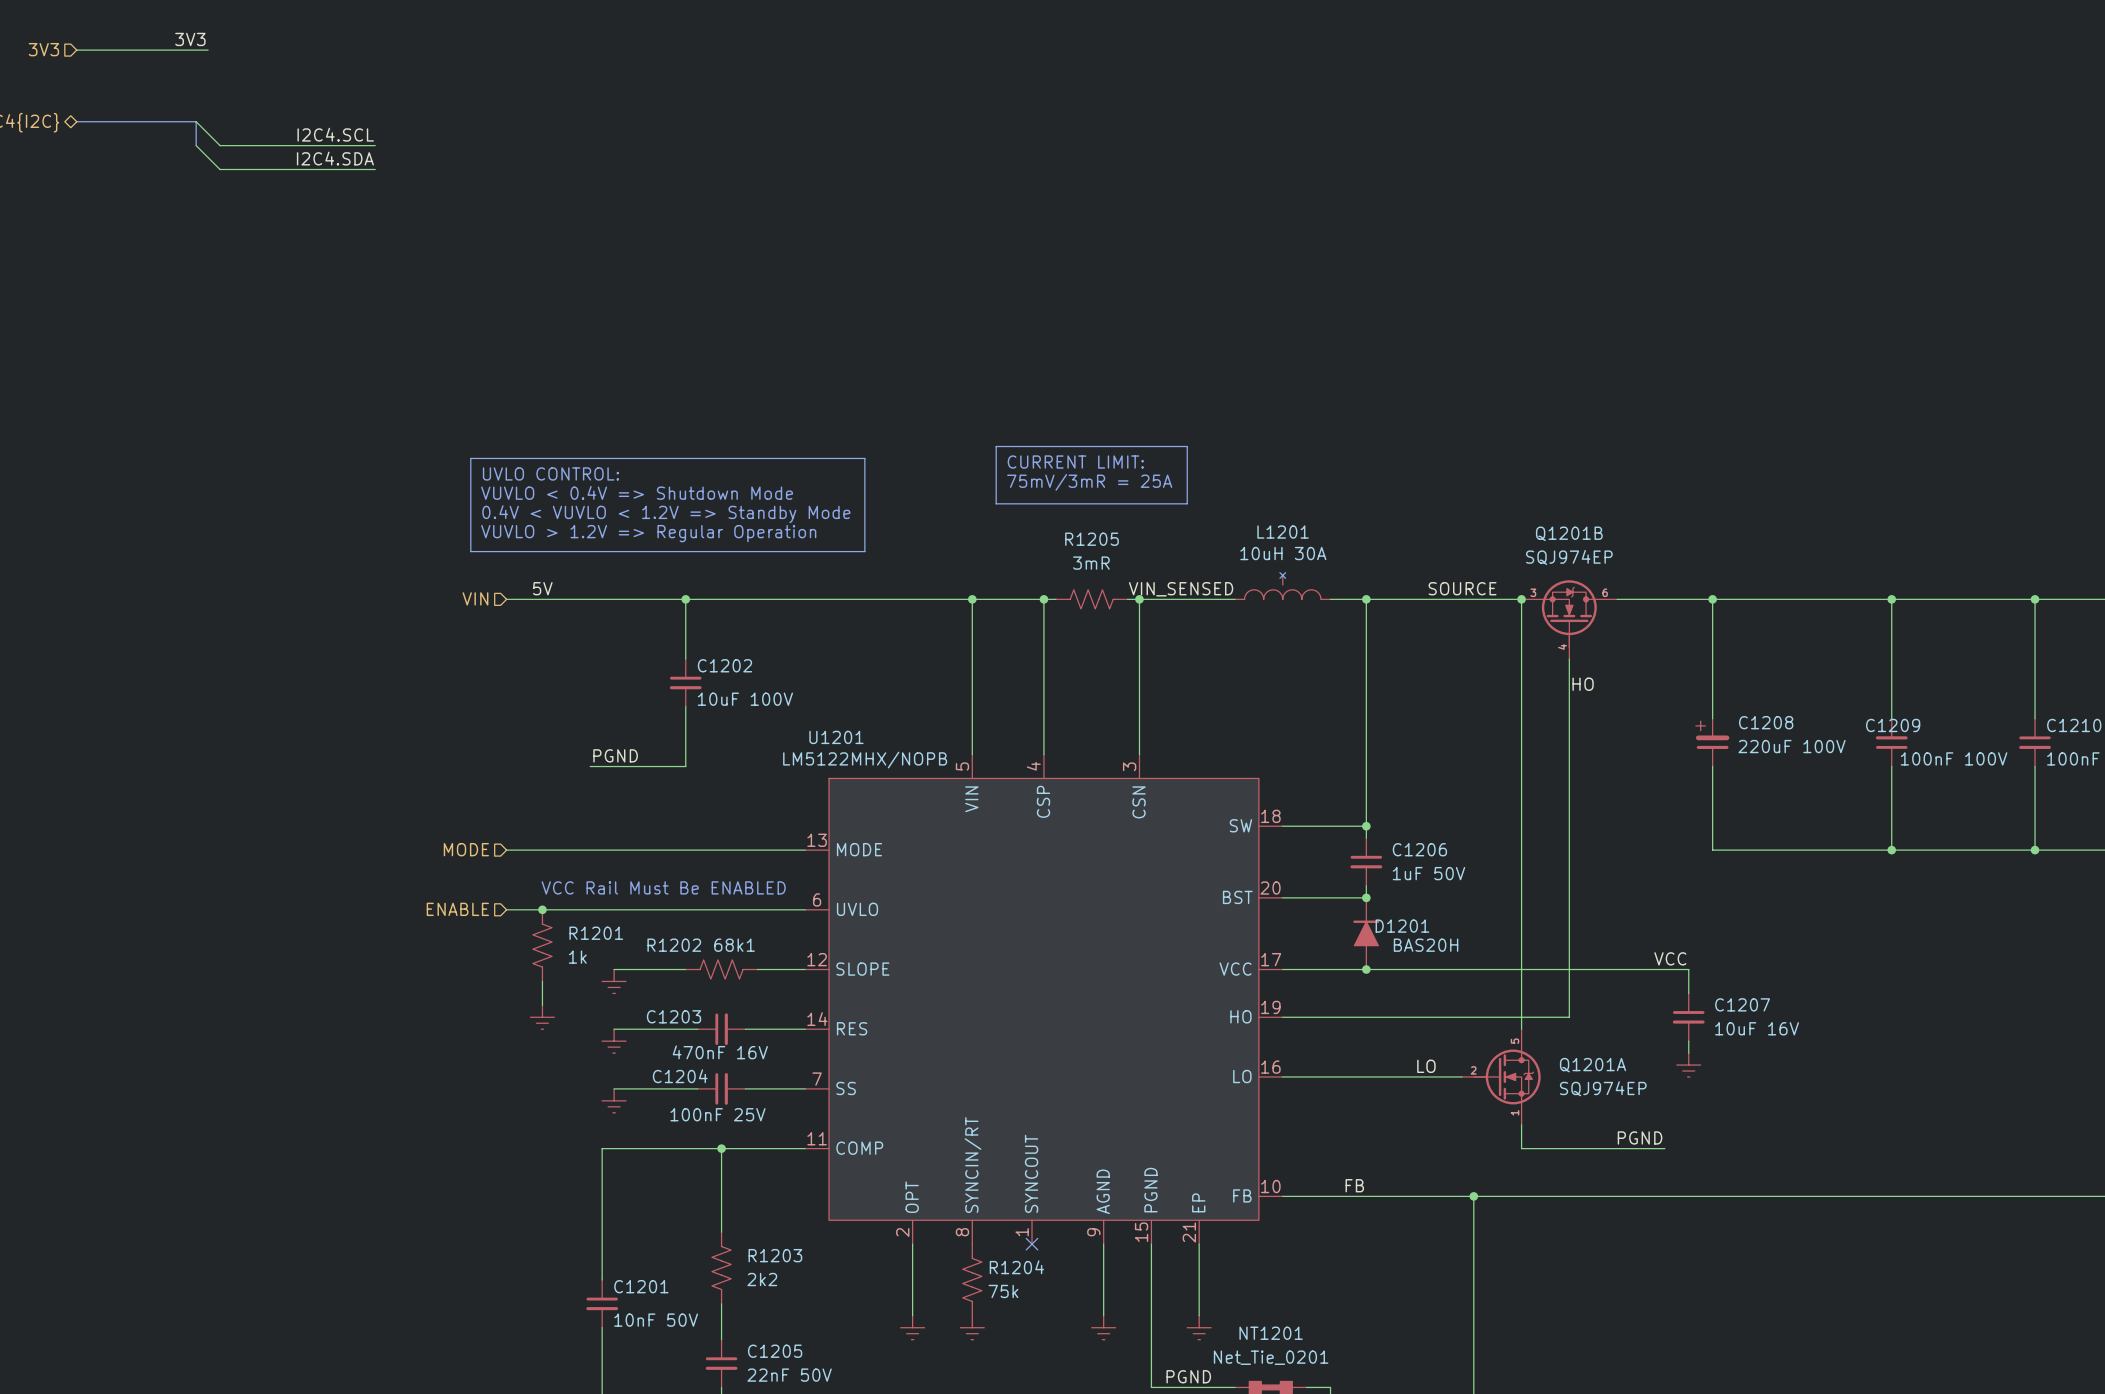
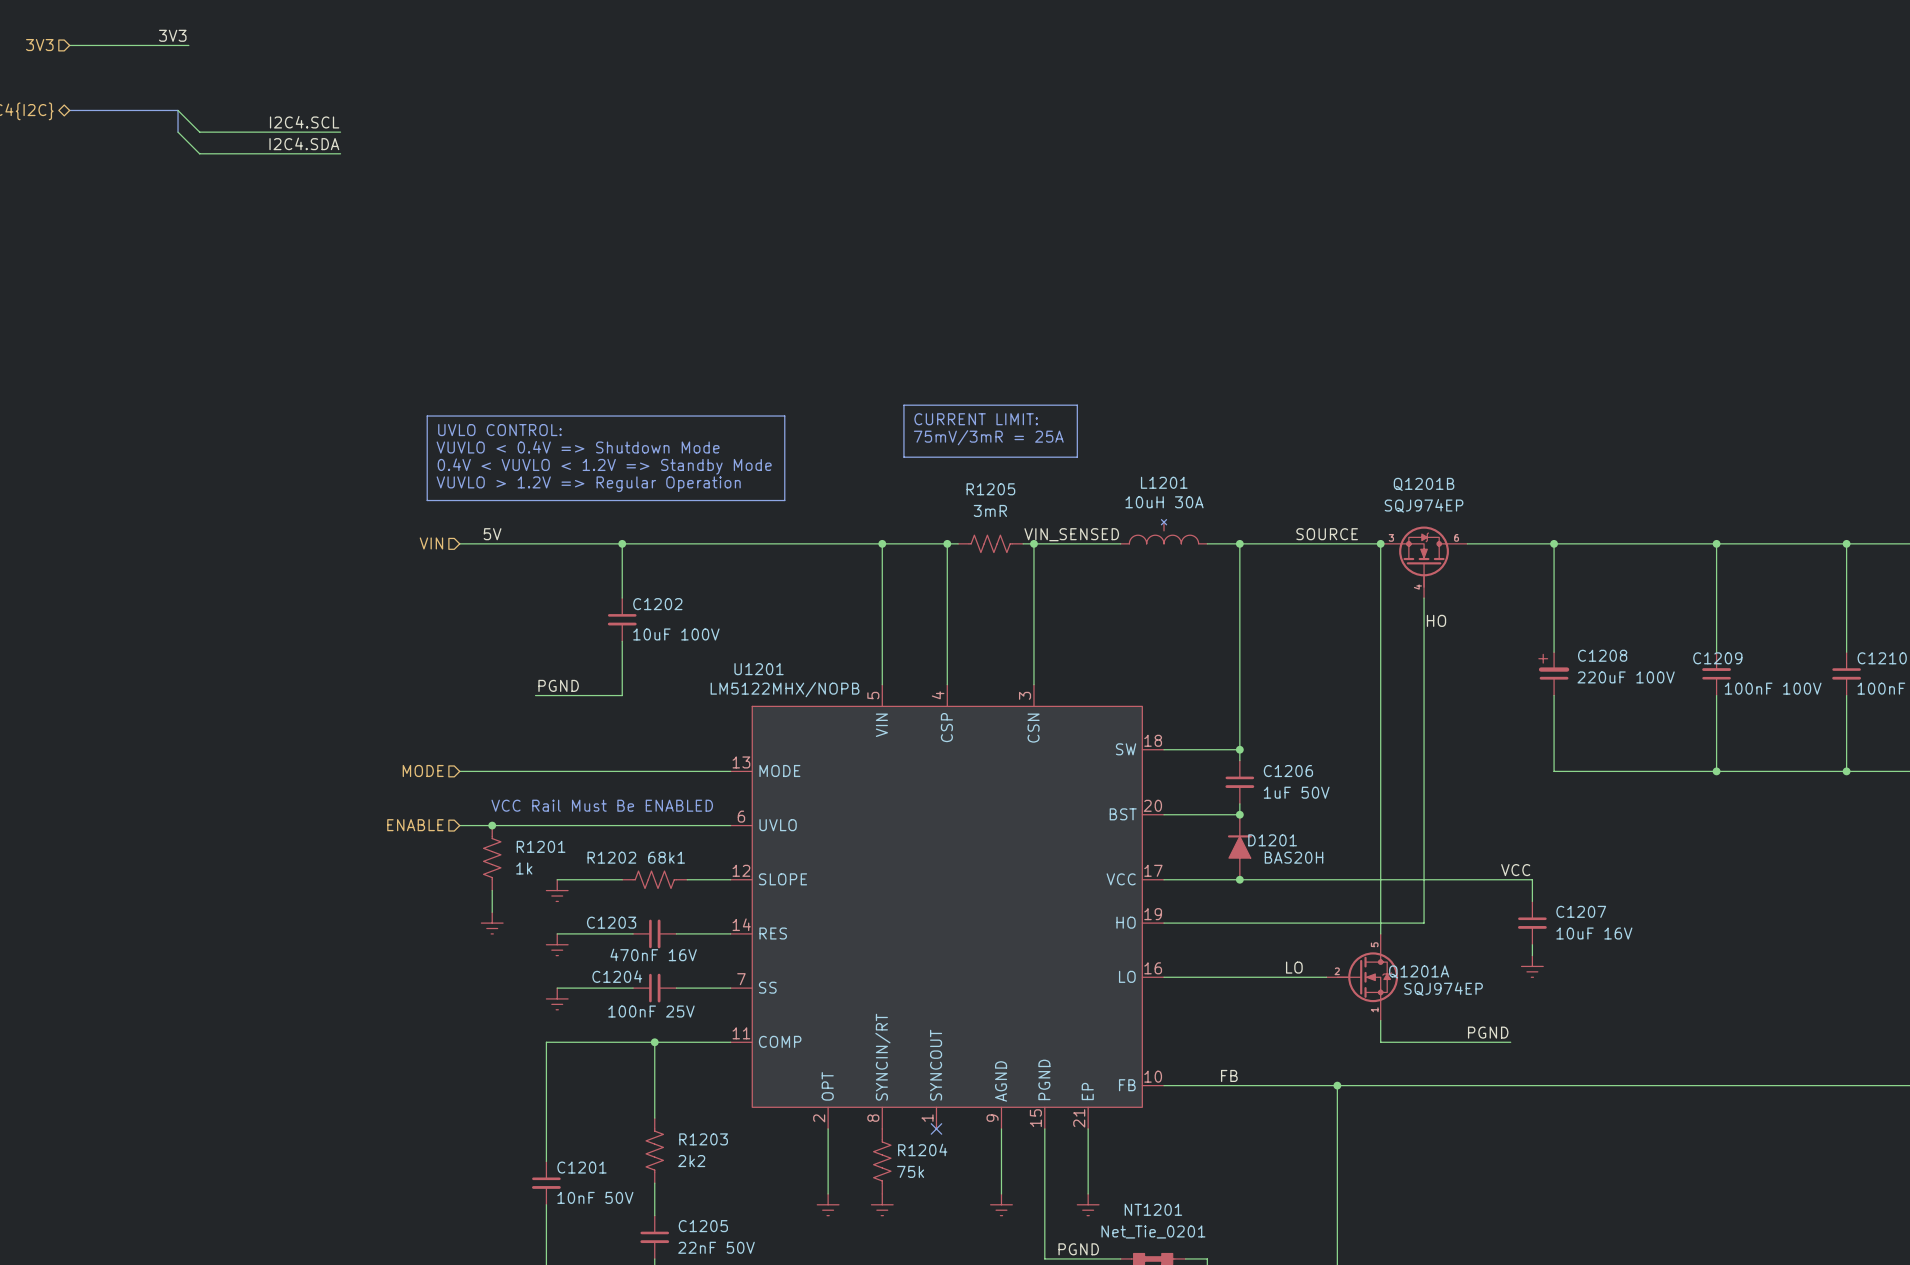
Q1201A name position: Q1201A (1593, 1065) -> Q1201A (1419, 971)
Q1201A value position: SQJ974EP (1603, 1088) -> SQJ974EP (1443, 989)

